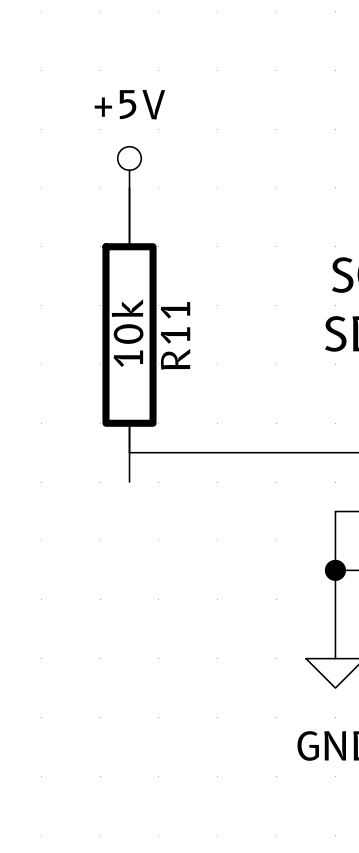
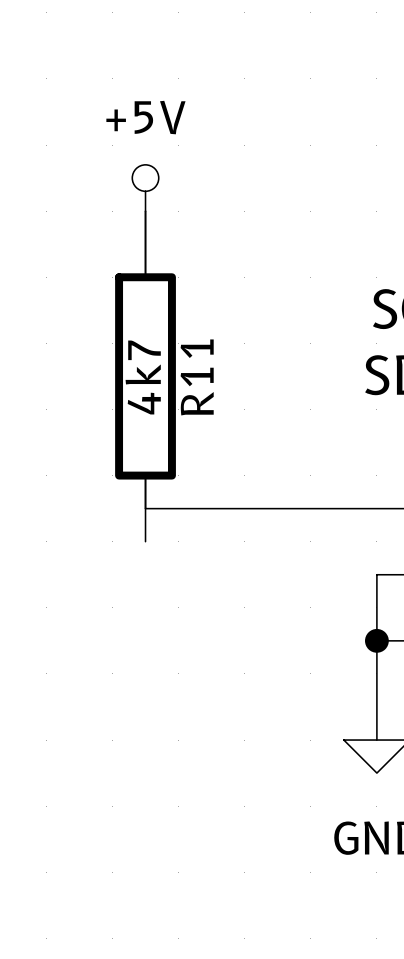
R11 value: 10k (127, 333) -> 4k7 (143, 377)

